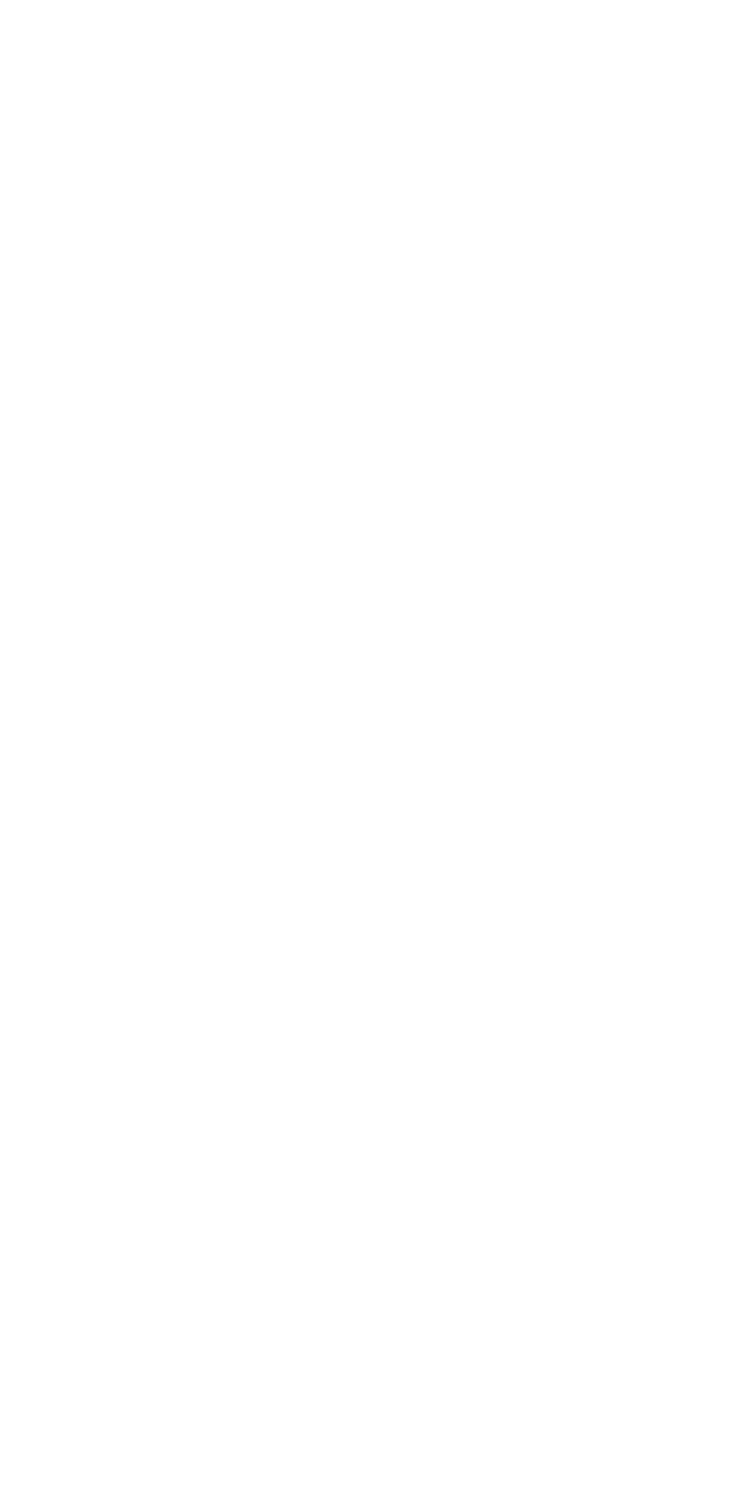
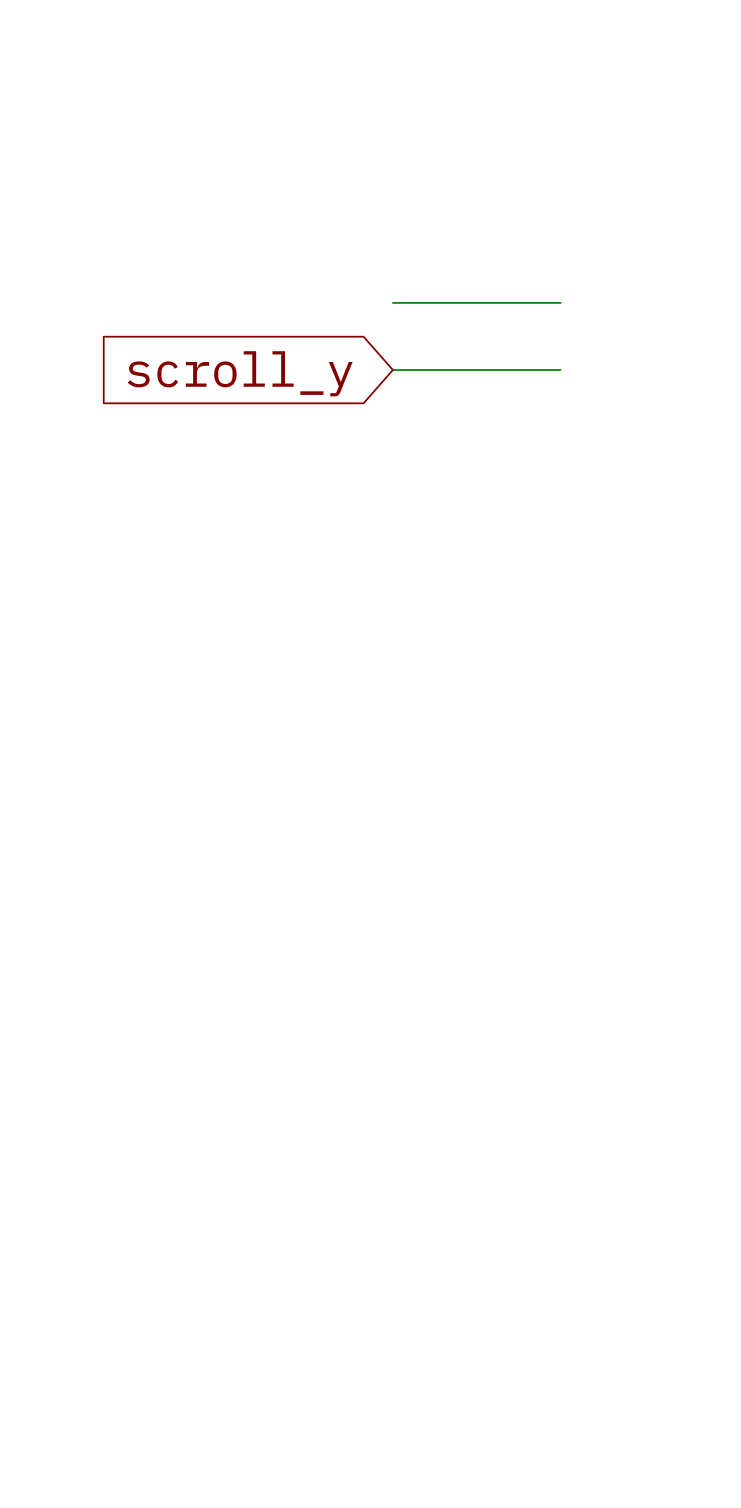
wire: none -> (392, 302) (560, 302)
wire: none -> (392, 370) (560, 370)
global label: none -> scroll_y (240, 373)

